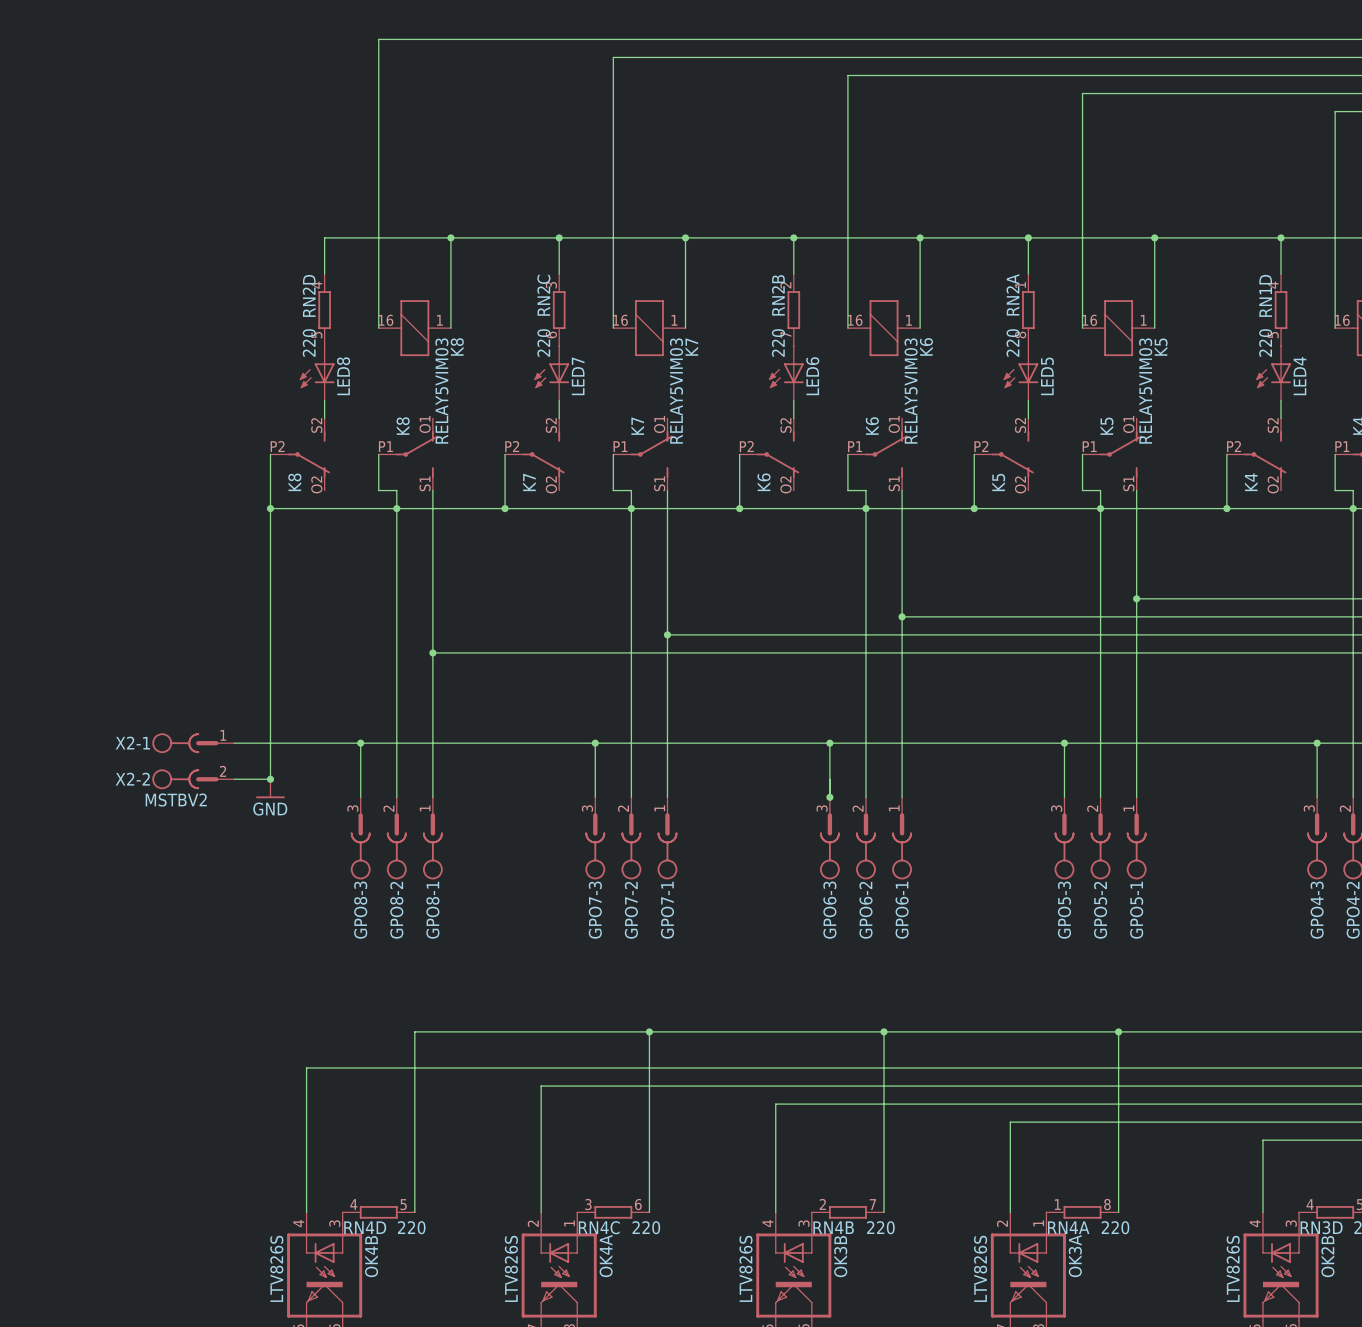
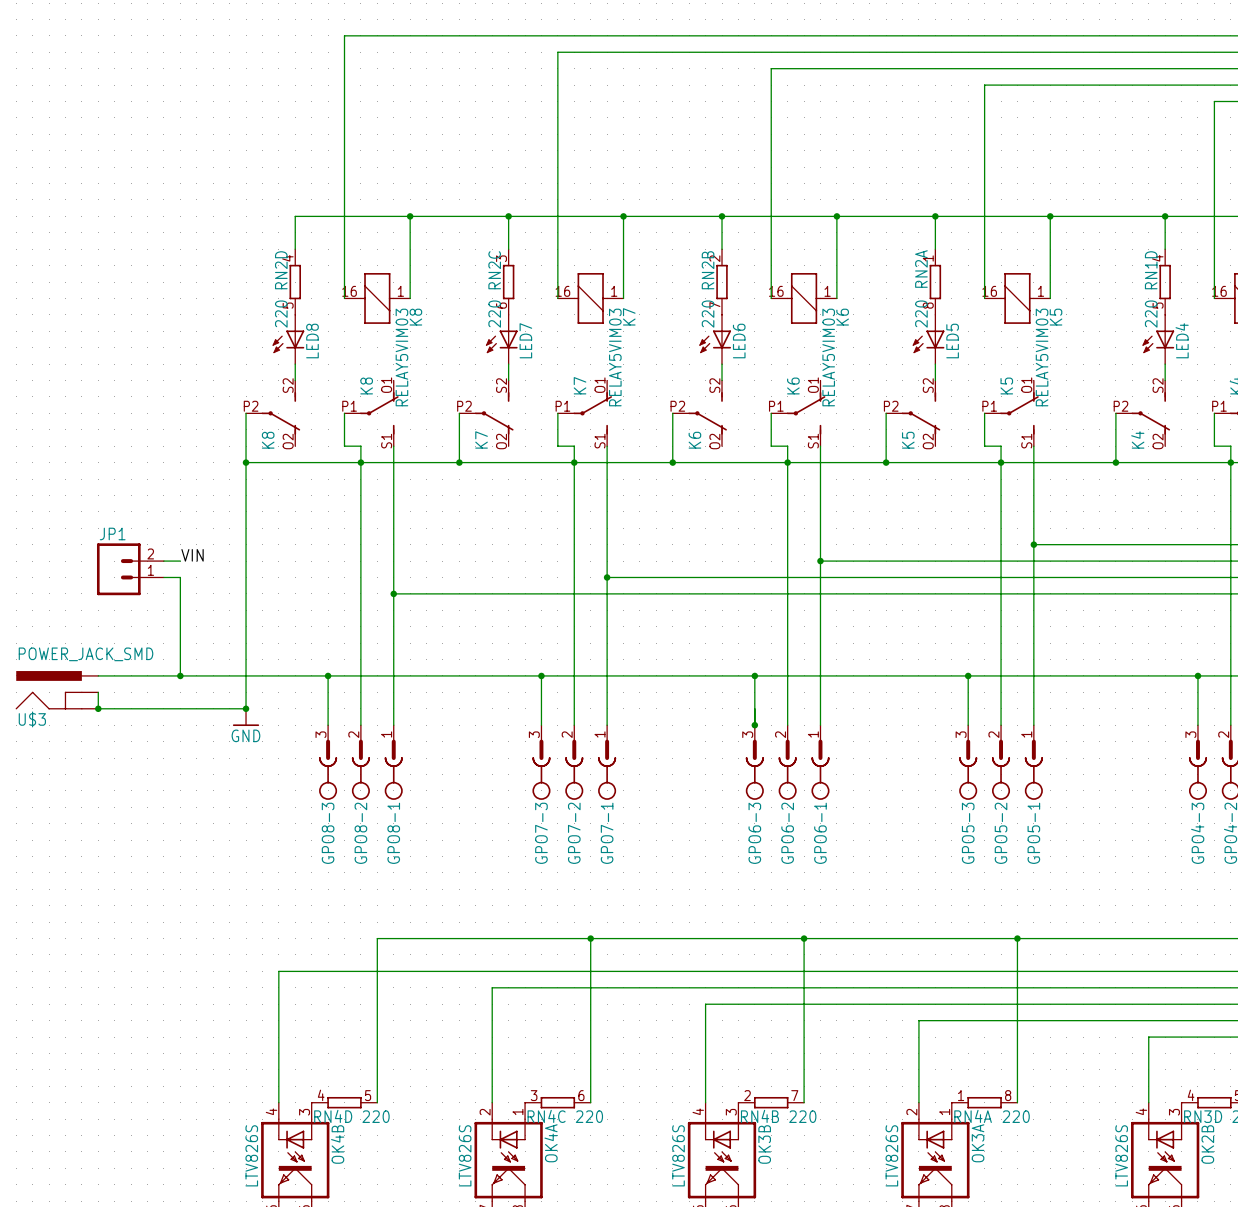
label: none -> VIN (192, 555)
wire: none -> (163, 561) (180, 561)
JP1: none -> (130, 569)
wire: none -> (163, 577) (180, 577) (180, 675)
wire: none -> (98, 675) (213, 675)
X2-1: (193, 743) -> none
junction: none -> (180, 675)
U$3: none -> POWER_JACK_SMD (57, 690)
wire: none -> (98, 692) (98, 708) (213, 708)
junction: none -> (98, 708)
X2-2: MSTBV2 (193, 779) -> none

